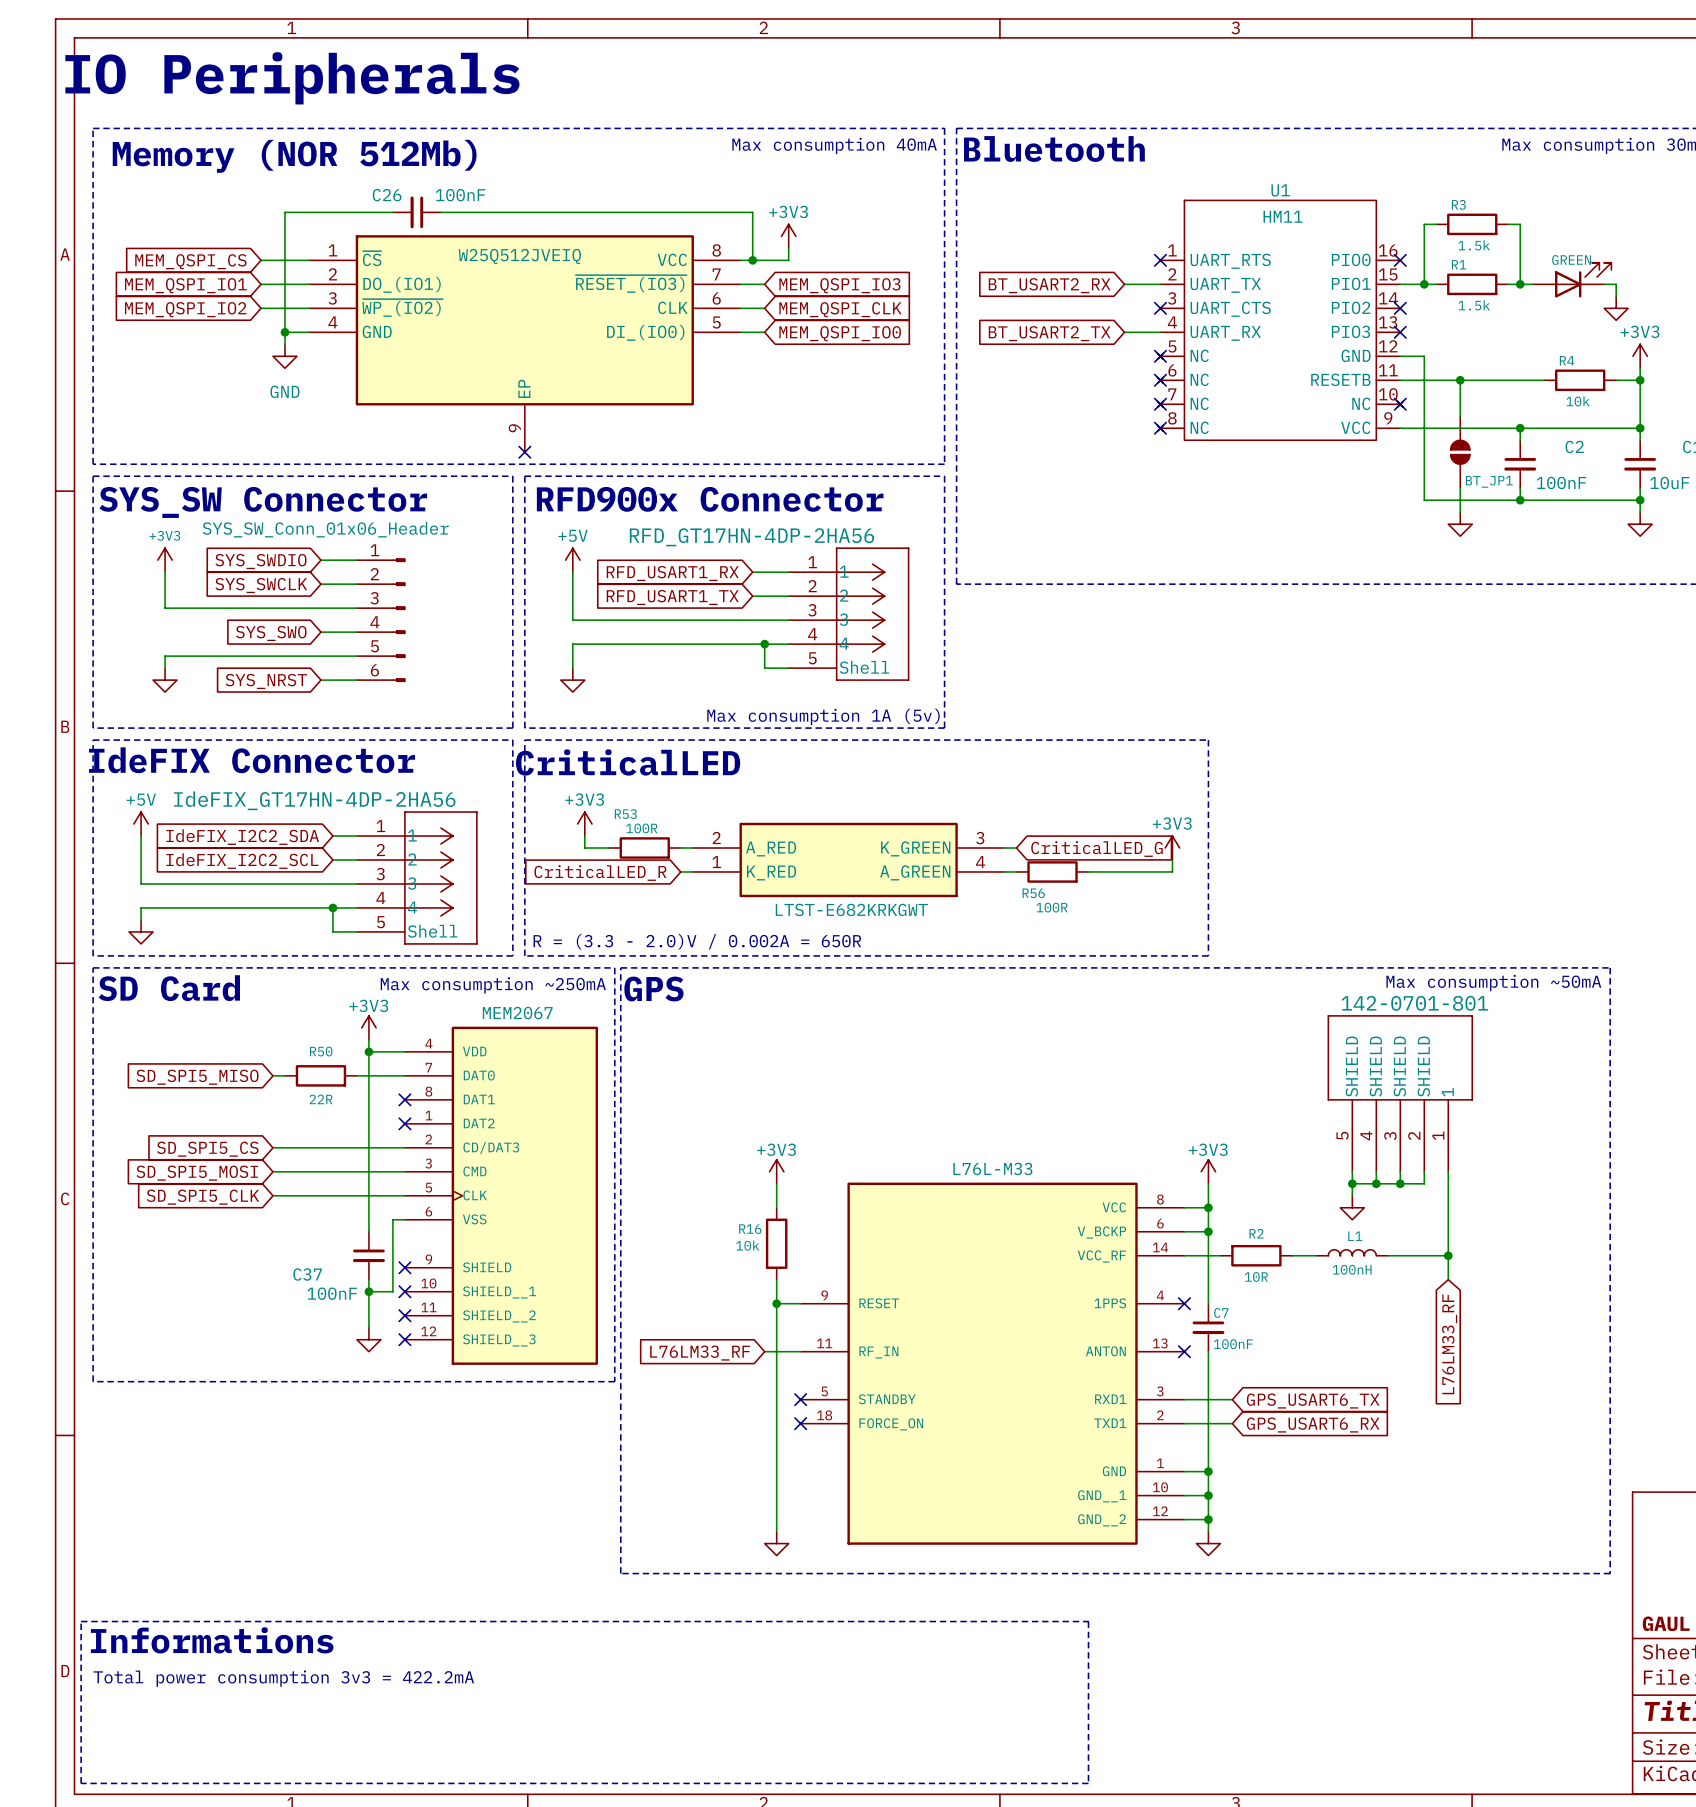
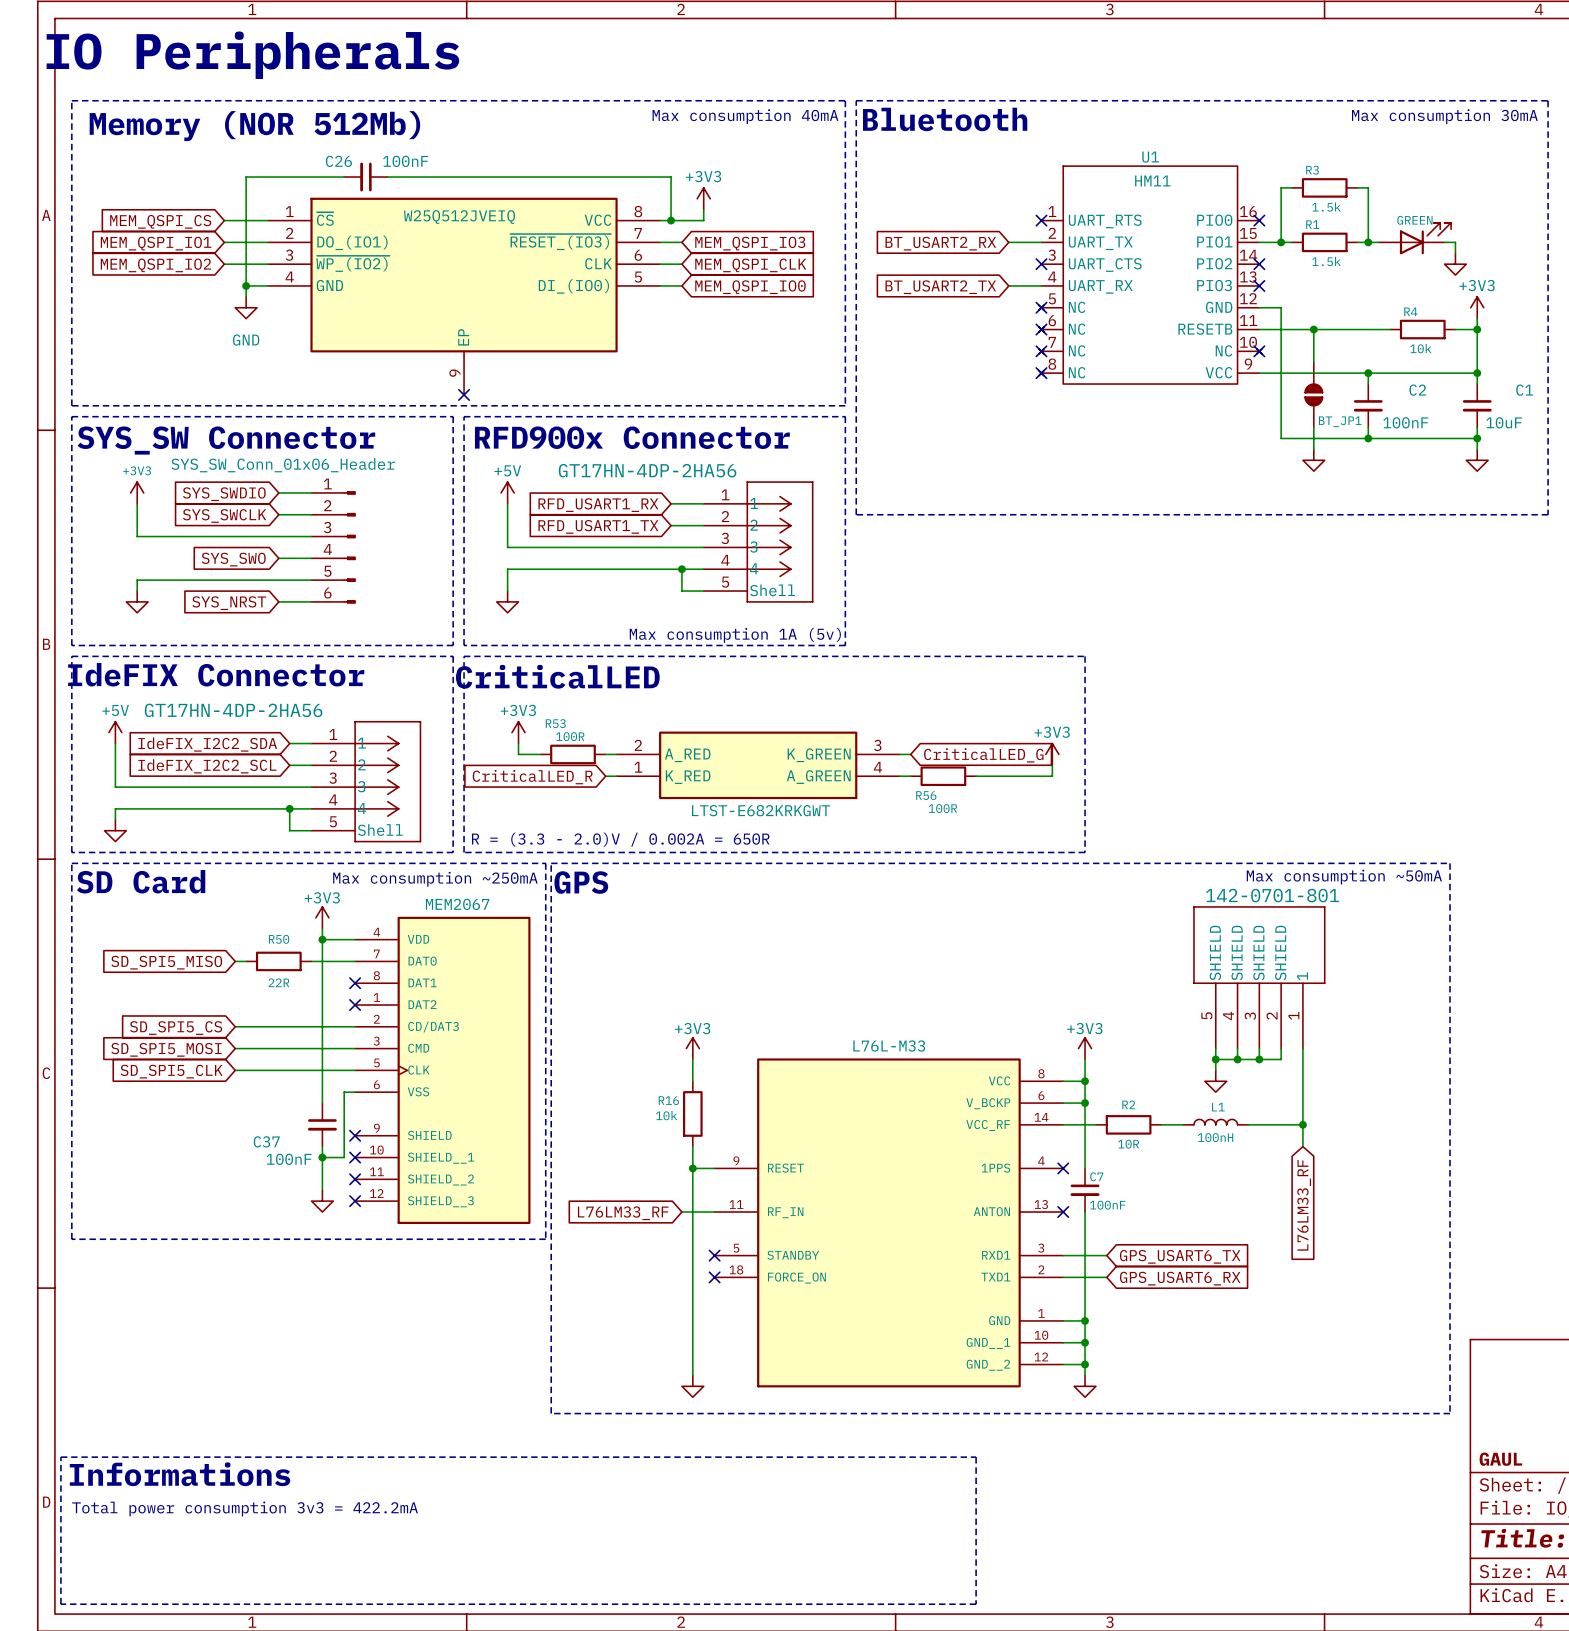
part value: RFD_GT17HN-4DP-2HA56 (751, 537) -> GT17HN-4DP-2HA56 (647, 470)
part value: IdeFIX_GT17HN-4DP-2HA56 (314, 800) -> GT17HN-4DP-2HA56 (233, 710)

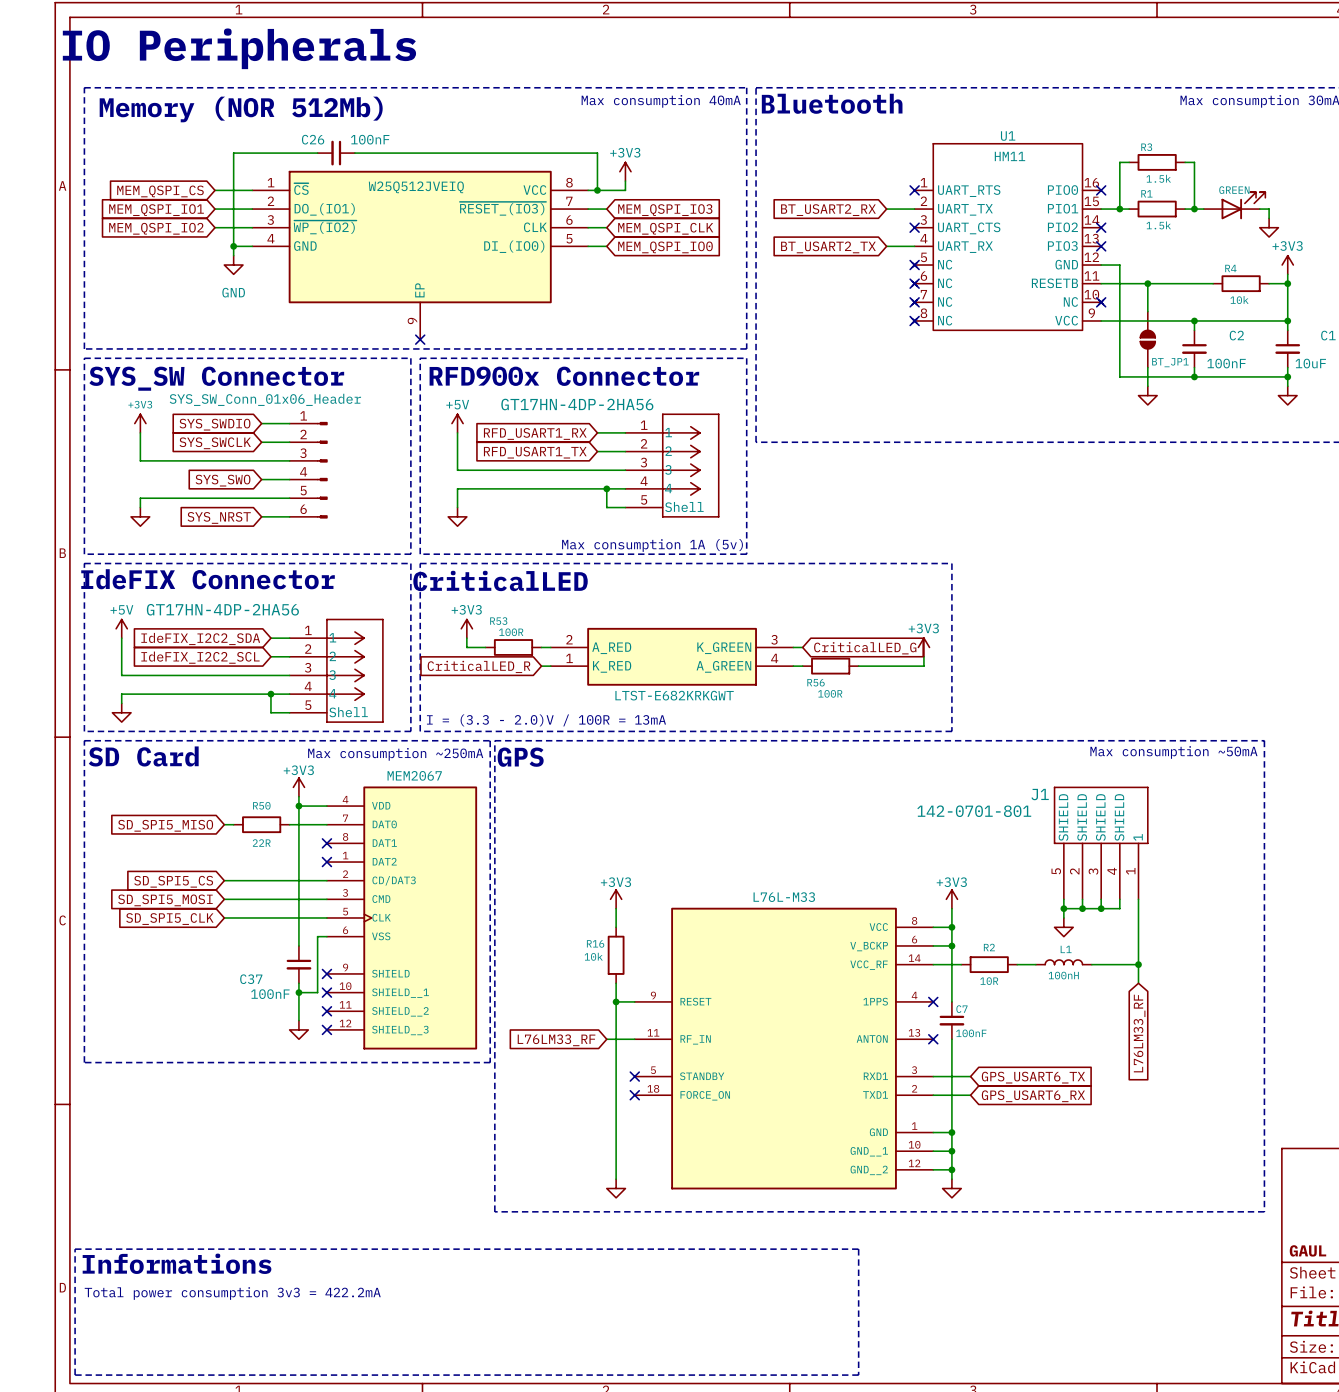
text: R = (3.3 - 2.0)V / 0.002A = 650R (620, 839) -> I = (3.3 - 2.0)V / 100R = 13mA (546, 720)
part: 142-0701-801 (1259, 977) -> none
J1: none -> 142-0701-801 (1101, 843)

